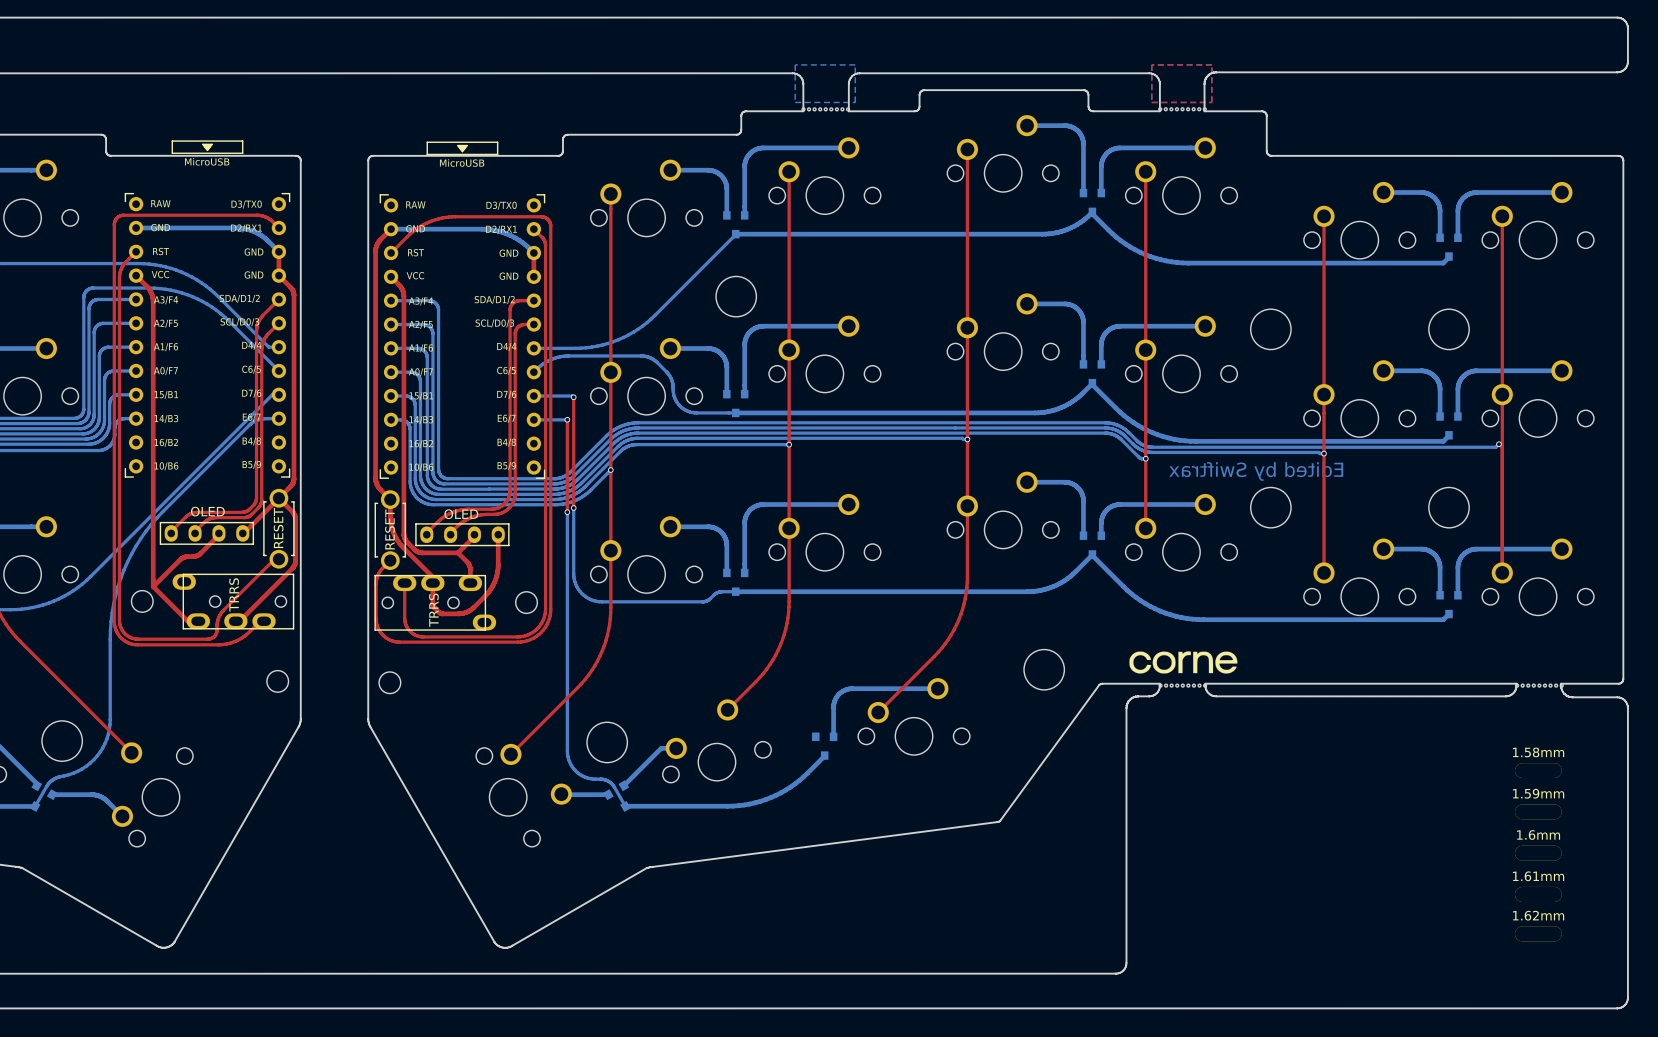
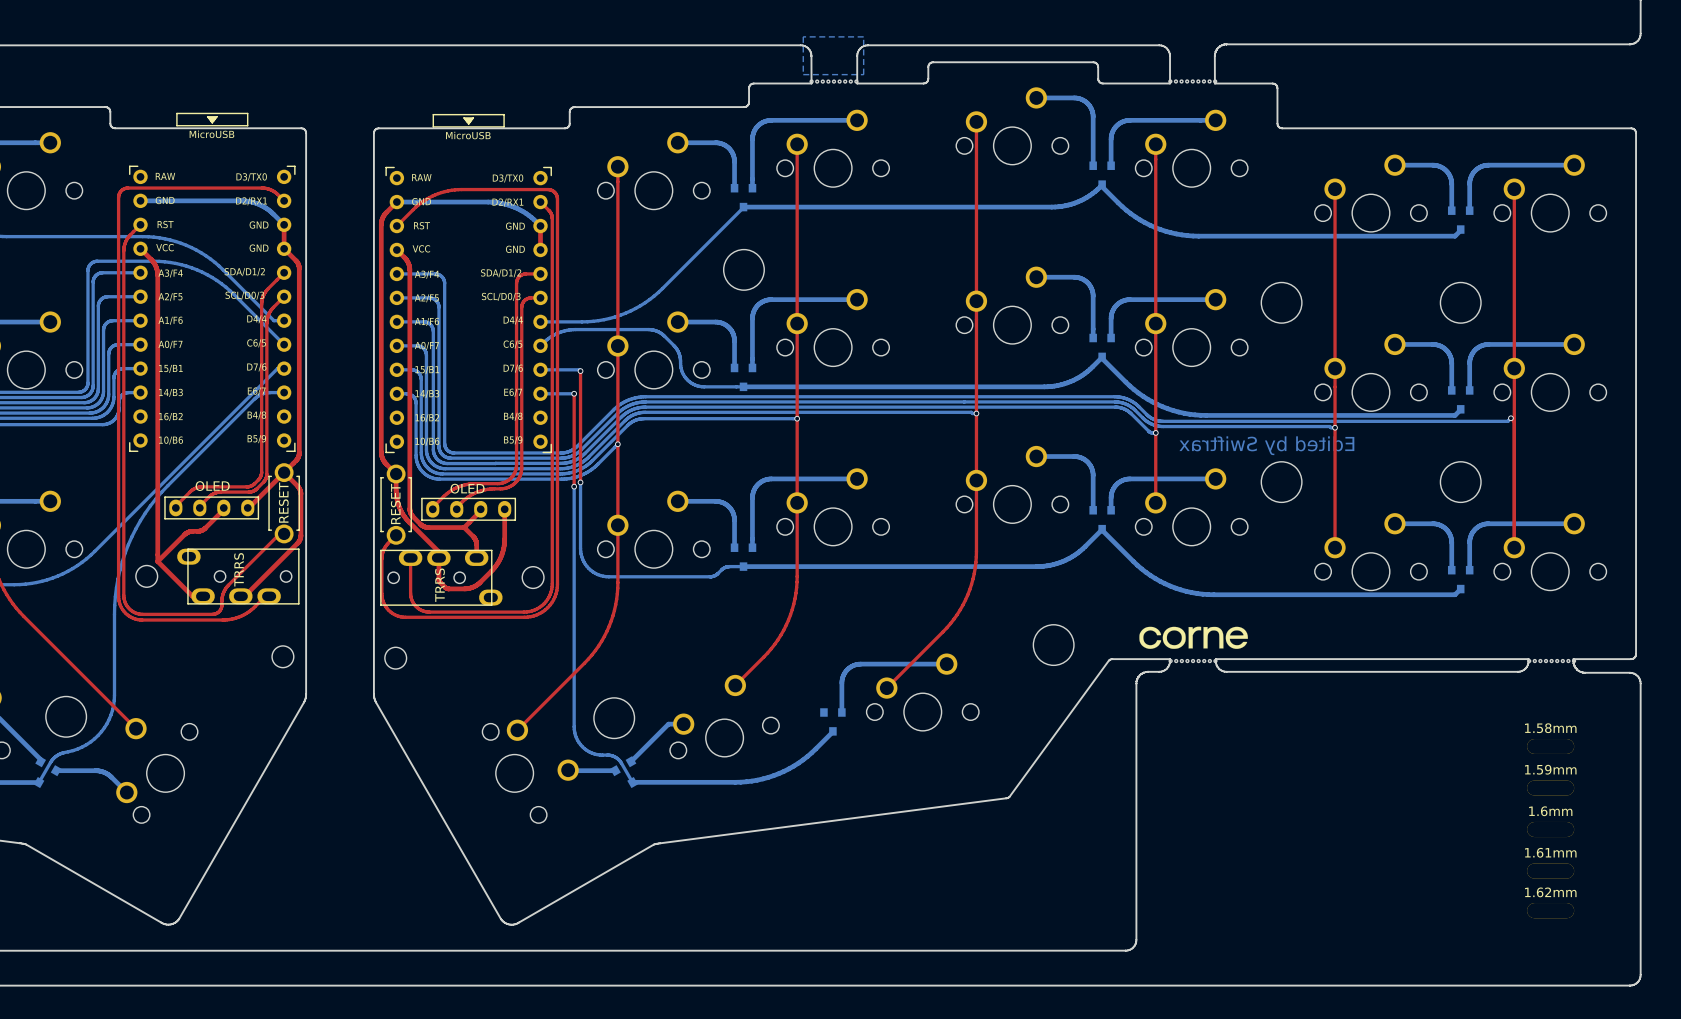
top zone outline: (1151, 64) (1151, 102) (1211, 102) (1211, 64) (1151, 64) -> none

